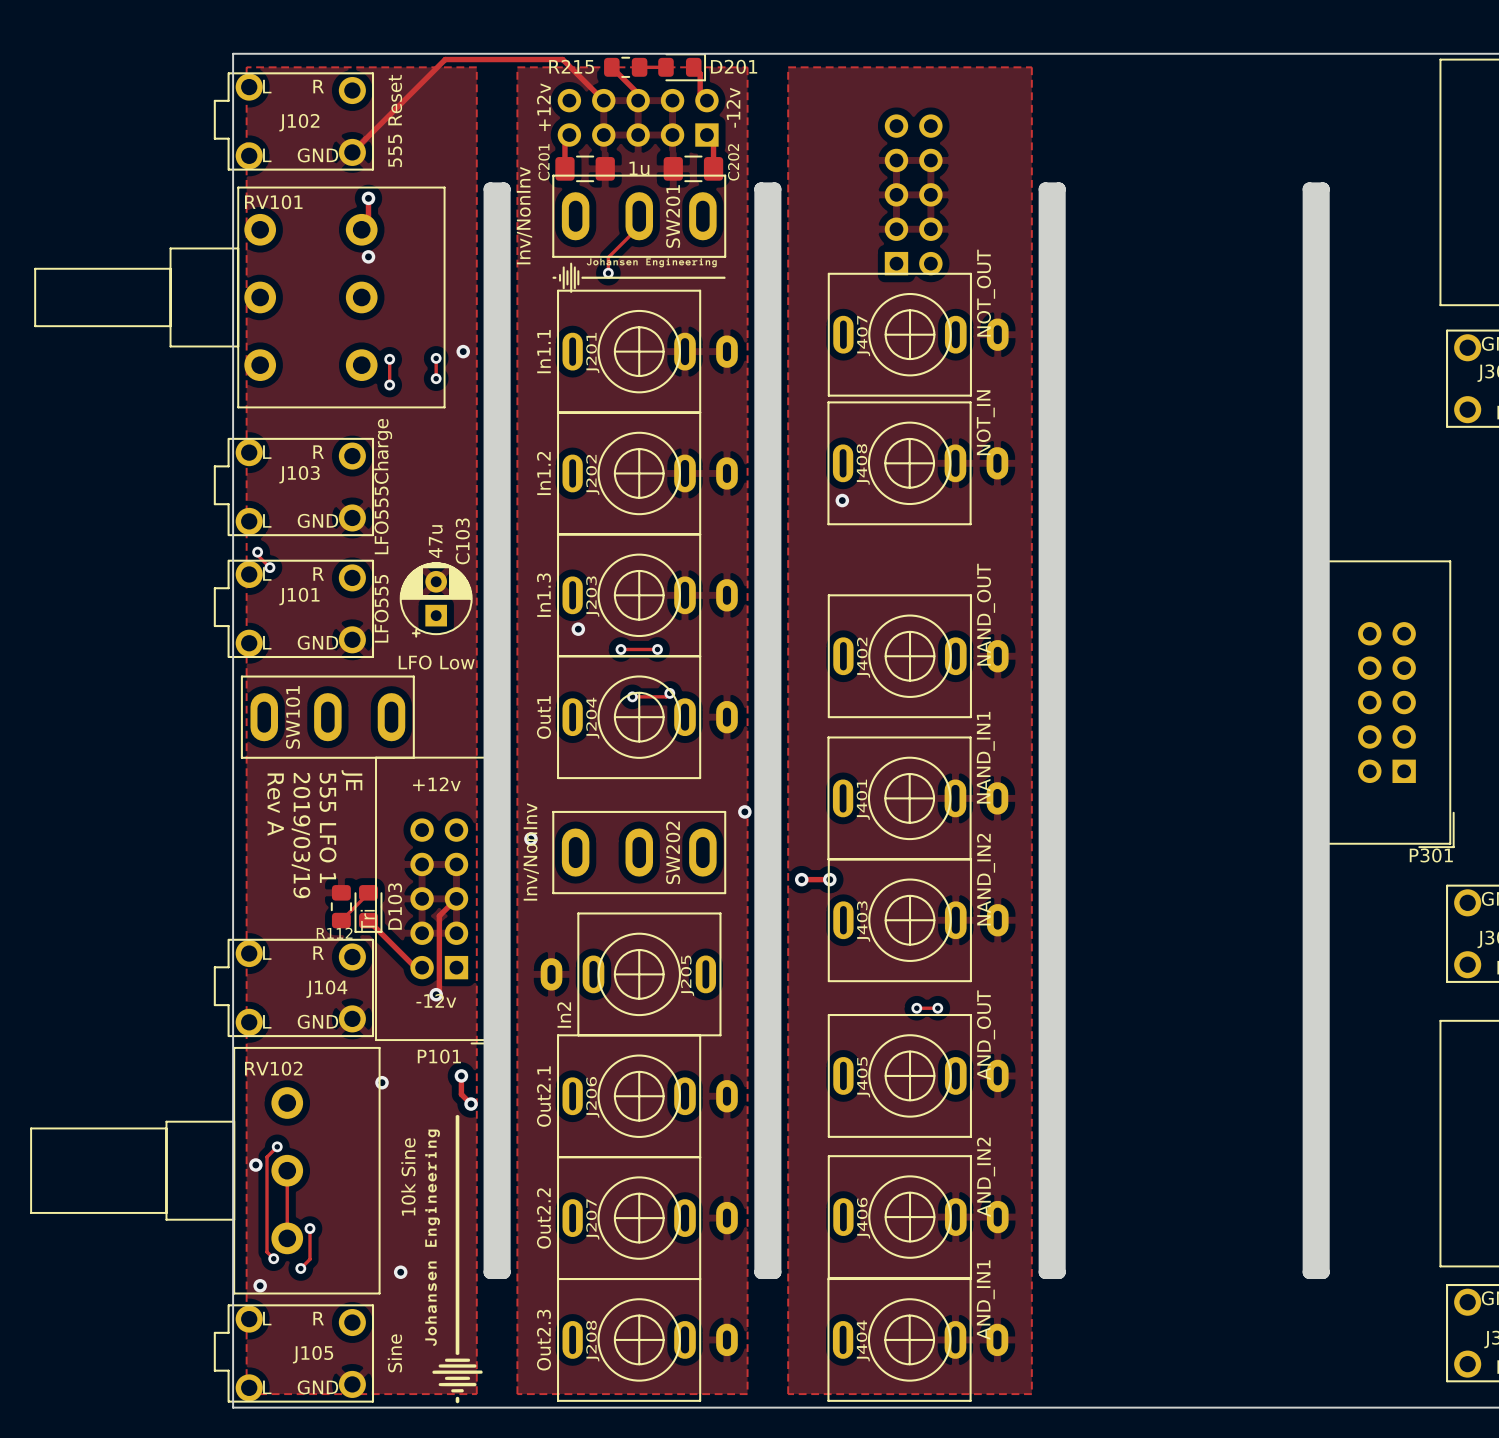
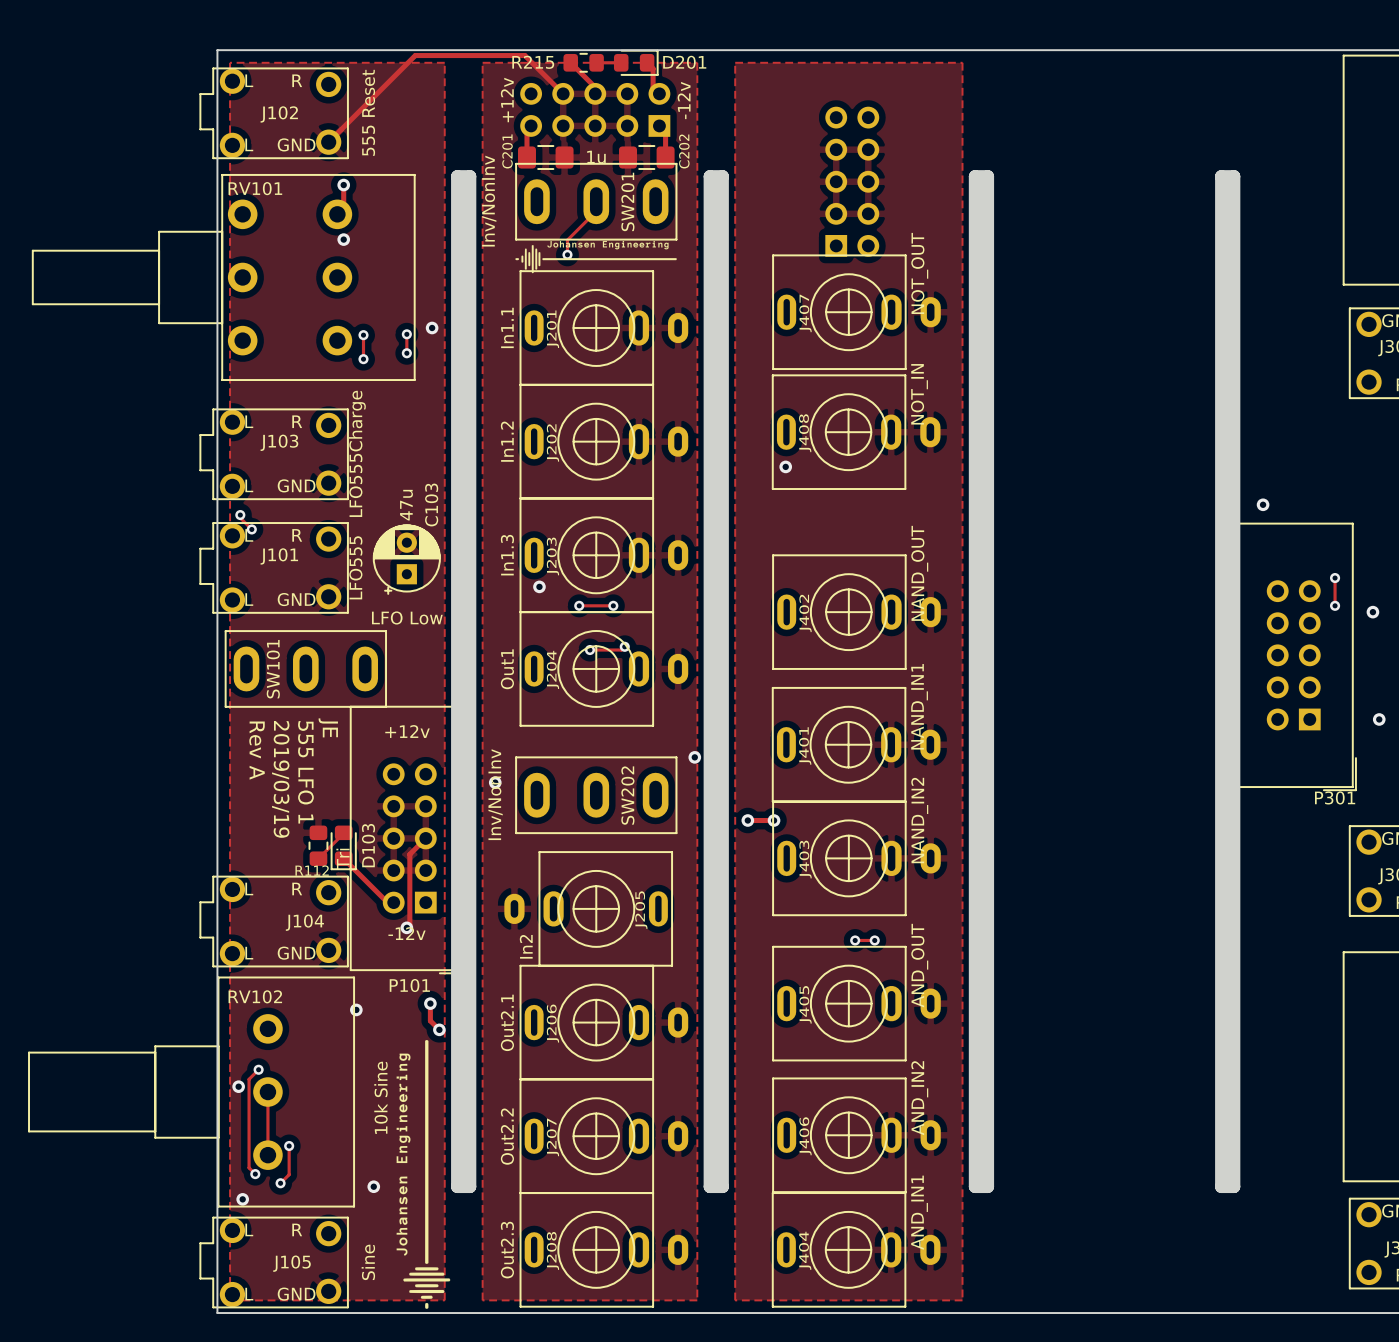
via: none -> (1263, 504)
track: none -> (1335, 578) (1335, 605)
via: none -> (1335, 578)
via: none -> (1335, 605)
via: none -> (1372, 612)
via: none -> (1379, 719)

